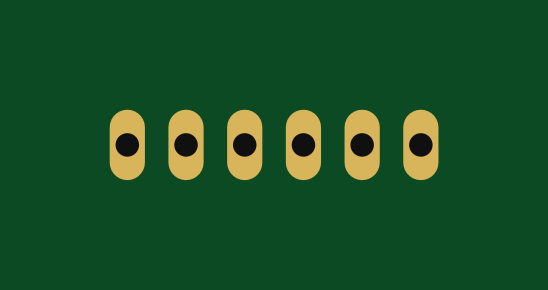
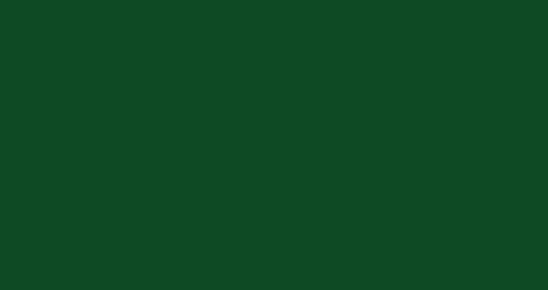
part: (274, 144) -> none

